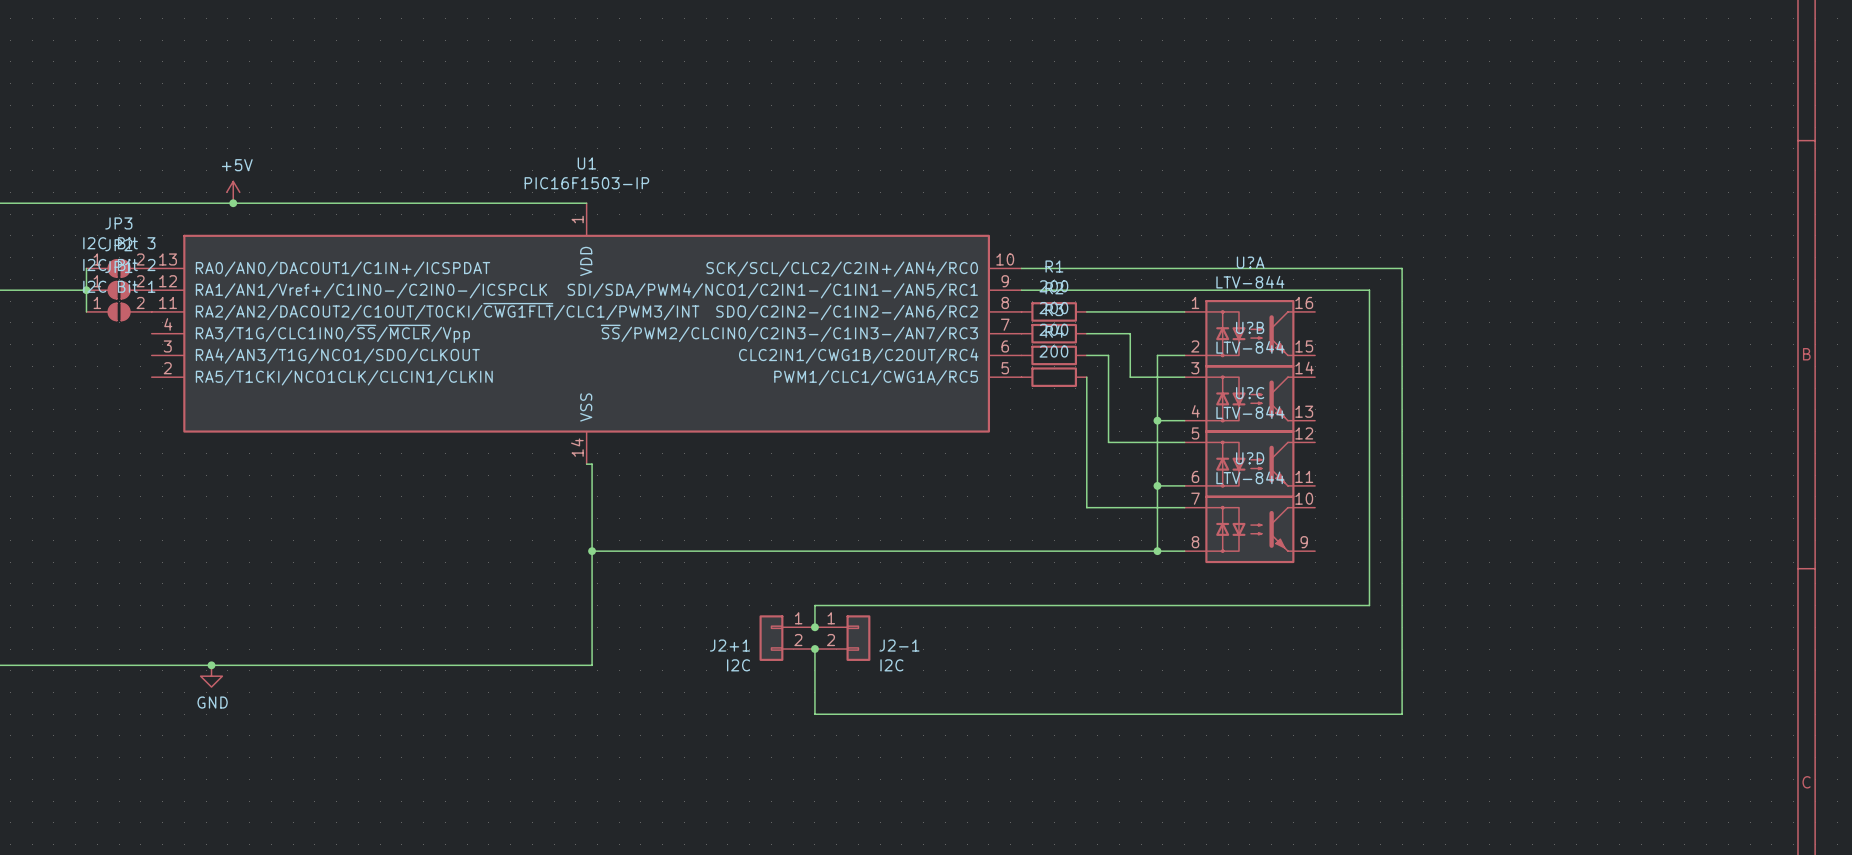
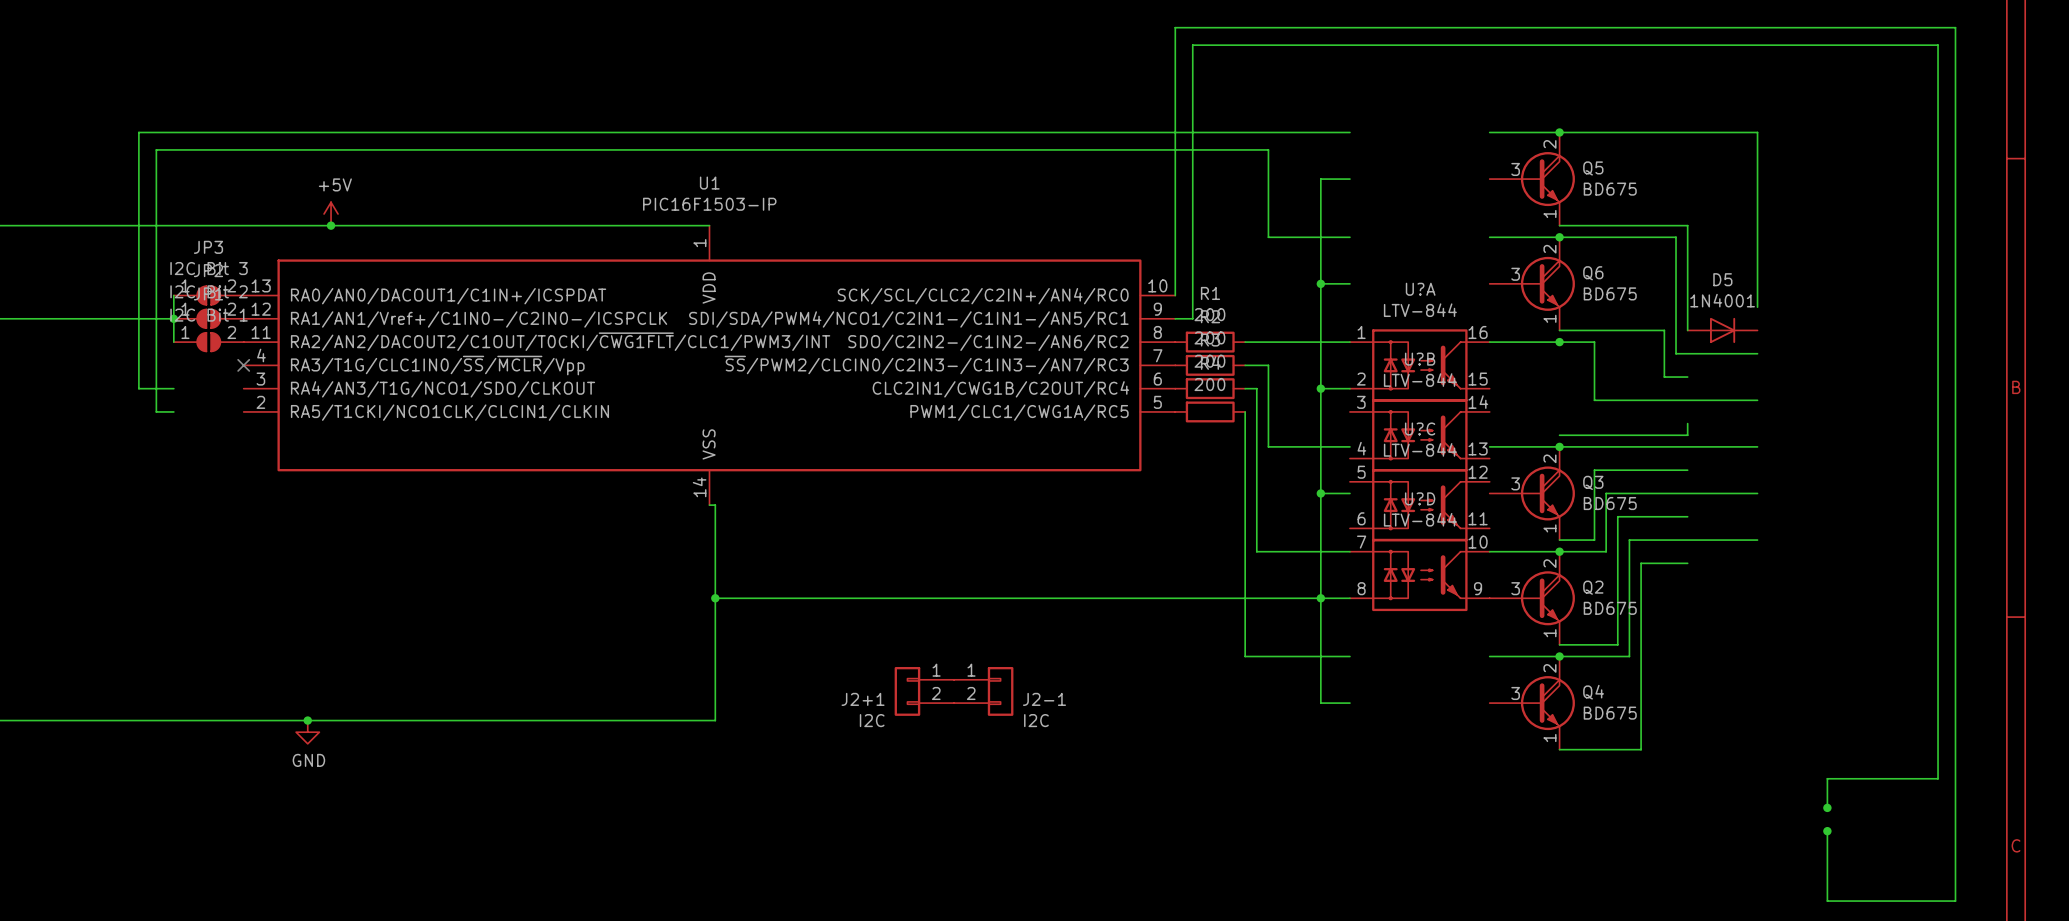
wire: none -> (1349, 132) (138, 132) (138, 388) (173, 388)
wire: none -> (1489, 132) (1757, 132) (1757, 307)
junction: none -> (1559, 132)
wire: none -> (1349, 179) (1320, 179) (1320, 388)
Q5: none -> BD675 (1532, 179)
wire: none -> (1559, 225) (1687, 225) (1687, 330)
wire: none -> (1349, 237) (1268, 237) (1268, 149) (156, 149) (156, 411) (173, 411)
wire: none -> (1489, 237) (1676, 237) (1676, 353) (1757, 353)
junction: none -> (1559, 237)
wire: none -> (1320, 283) (1349, 283)
junction: none -> (1320, 283)
Q6: none -> BD675 (1532, 283)
wire: (1021, 268) (1402, 268) (1402, 714) (814, 714) (814, 649) -> (1175, 295) (1175, 27) (1955, 27) (1955, 901) (1827, 901) (1827, 831)
wire: (1037, 290) (1369, 290) (1369, 605) -> (1192, 318) (1192, 45) (1938, 45) (1938, 778) (1827, 778) (1827, 807)
wire: none -> (1559, 330) (1664, 330) (1664, 377) (1687, 377)
D5: none -> 1N4001 (1722, 330)
wire: none -> (1489, 342) (1594, 342) (1594, 400) (1757, 400)
junction: none -> (1559, 342)
no-connect mark: none -> (243, 365)
wire: (1108, 333) (1130, 333) (1130, 377) (1184, 377) -> none
wire: (1097, 355) (1108, 355) -> (1268, 365) (1268, 388)
wire: none -> (1256, 388) (1256, 551)
junction: none -> (1320, 388)
wire: none -> (1687, 423) (1687, 435) (1559, 435)
wire: (1108, 409) (1108, 442) (1184, 442) -> (1268, 446) (1349, 446)
wire: none -> (1489, 446) (1757, 446)
junction: none -> (1559, 446)
wire: (1157, 420) (1184, 420) -> (1320, 493) (1349, 493)
junction: (1157, 420) -> none
wire: none -> (1687, 470) (1594, 470) (1594, 540) (1559, 540)
junction: none -> (1320, 493)
Q3: none -> BD675 (1532, 493)
wire: none -> (1757, 493) (1606, 493) (1606, 551) (1489, 551)
wire: none -> (1687, 516) (1617, 516) (1617, 644) (1559, 644)
wire: (1157, 485) (1184, 485) -> none
junction: (1157, 485) -> none
wire: none -> (1757, 540) (1629, 540) (1629, 656) (1547, 656)
wire: (1086, 507) (1097, 507) -> (1245, 551) (1245, 656)
junction: none -> (1559, 551)
wire: none -> (1687, 563) (1641, 563) (1641, 749) (1559, 749)
wire: none -> (1320, 598) (1320, 703) (1349, 703)
Q2: none -> BD675 (1532, 598)
wire: (1086, 605) (814, 605) (814, 627) -> none
wire: (1184, 605) (1315, 605) -> none
junction: none -> (1559, 656)
junction: (814, 627) -> none
junction: (814, 649) -> none
Q4: none -> BD675 (1532, 703)
junction: none -> (1827, 807)
junction: none -> (1827, 831)

